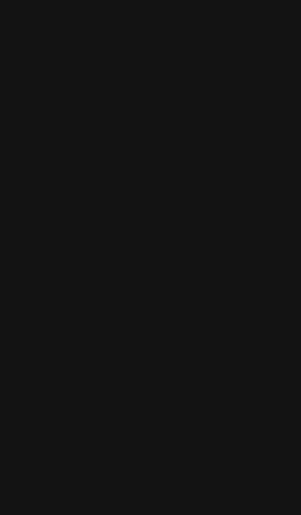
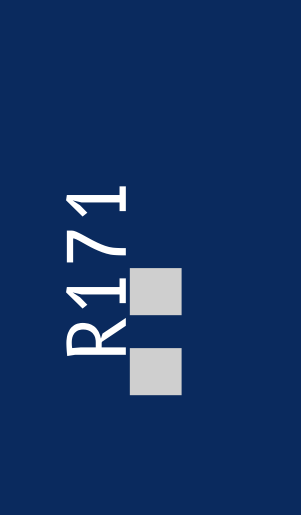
R171: none -> (155, 331)

